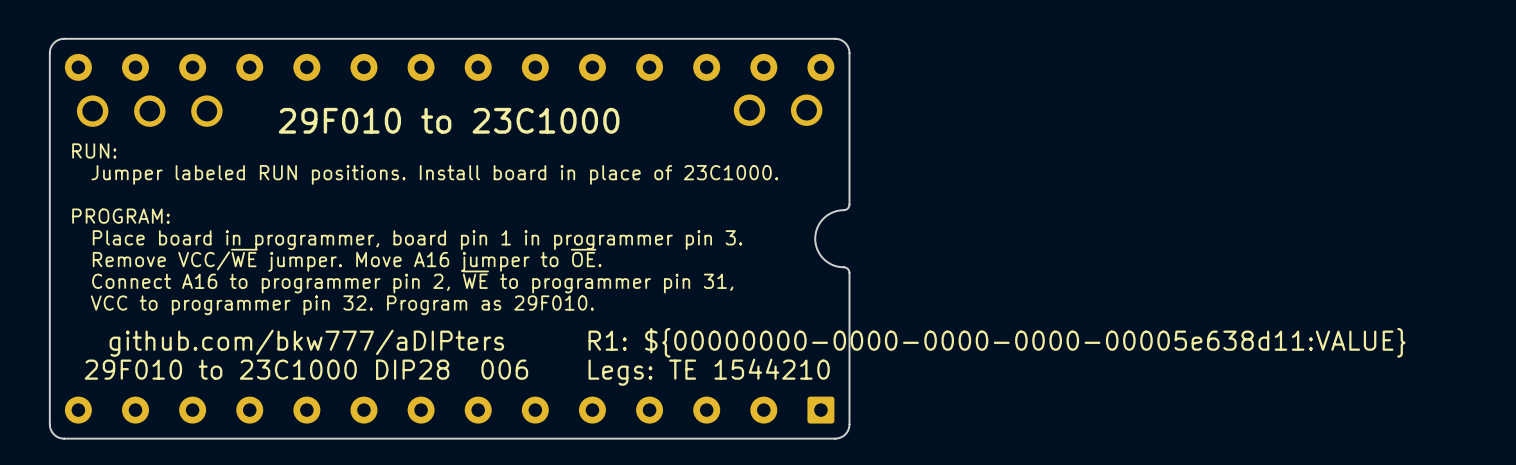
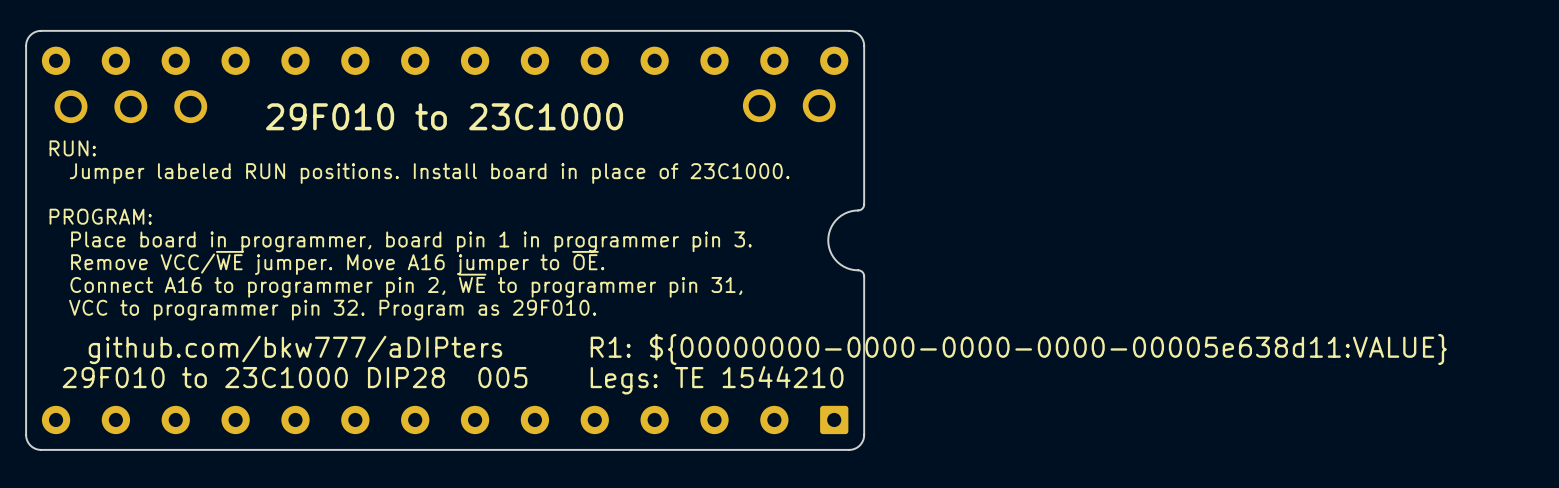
text: 29F010 to 23C1000 DIP28 006 (306, 369) -> 29F010 to 23C1000 DIP28 005 (295, 377)

